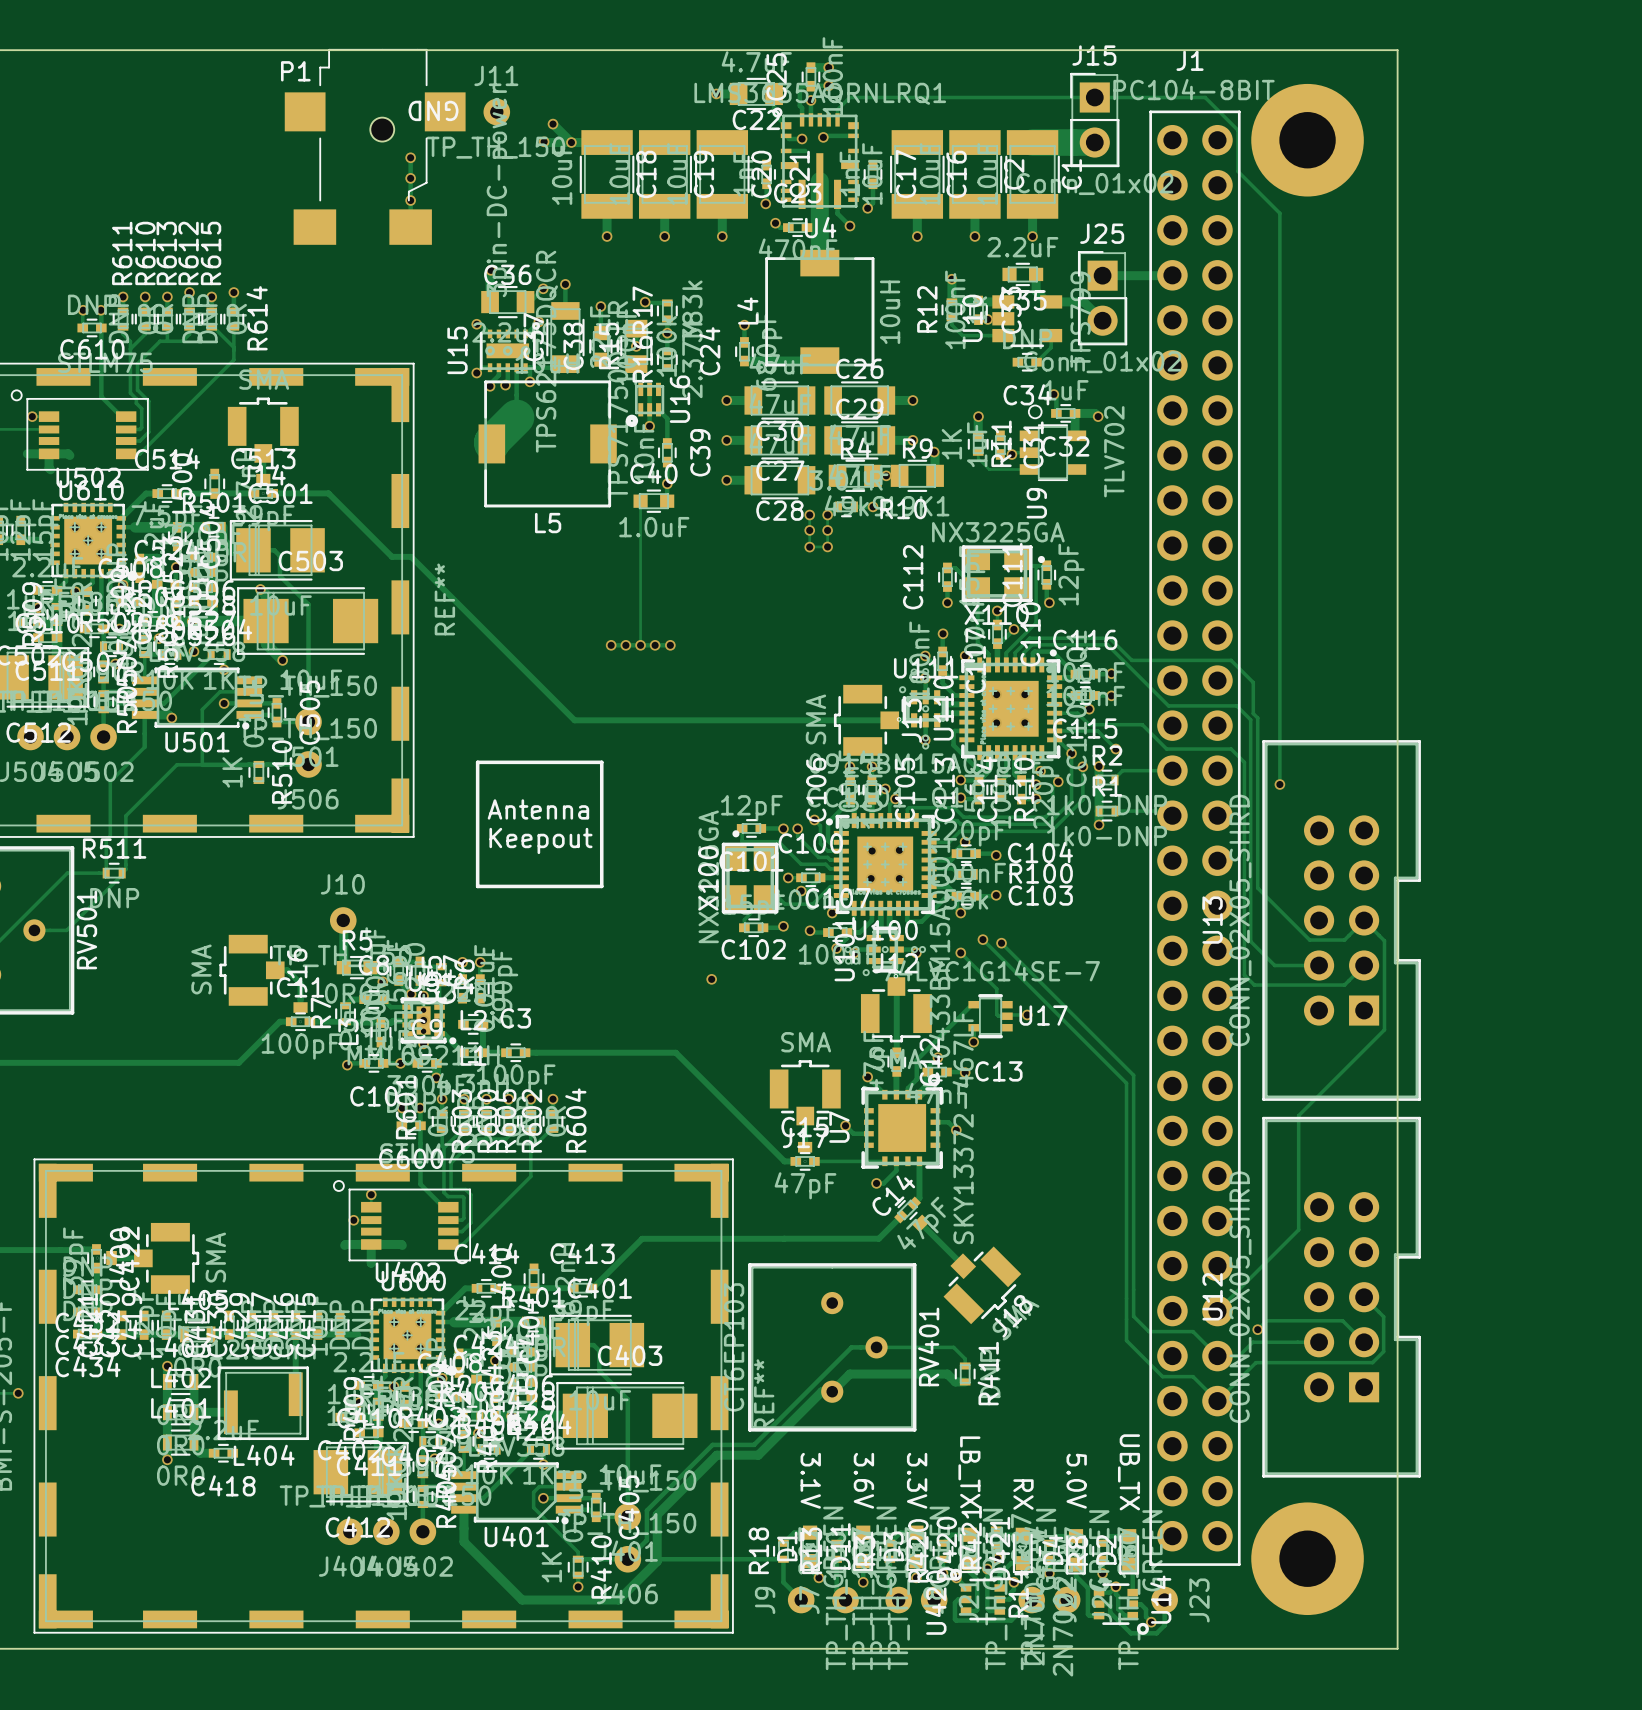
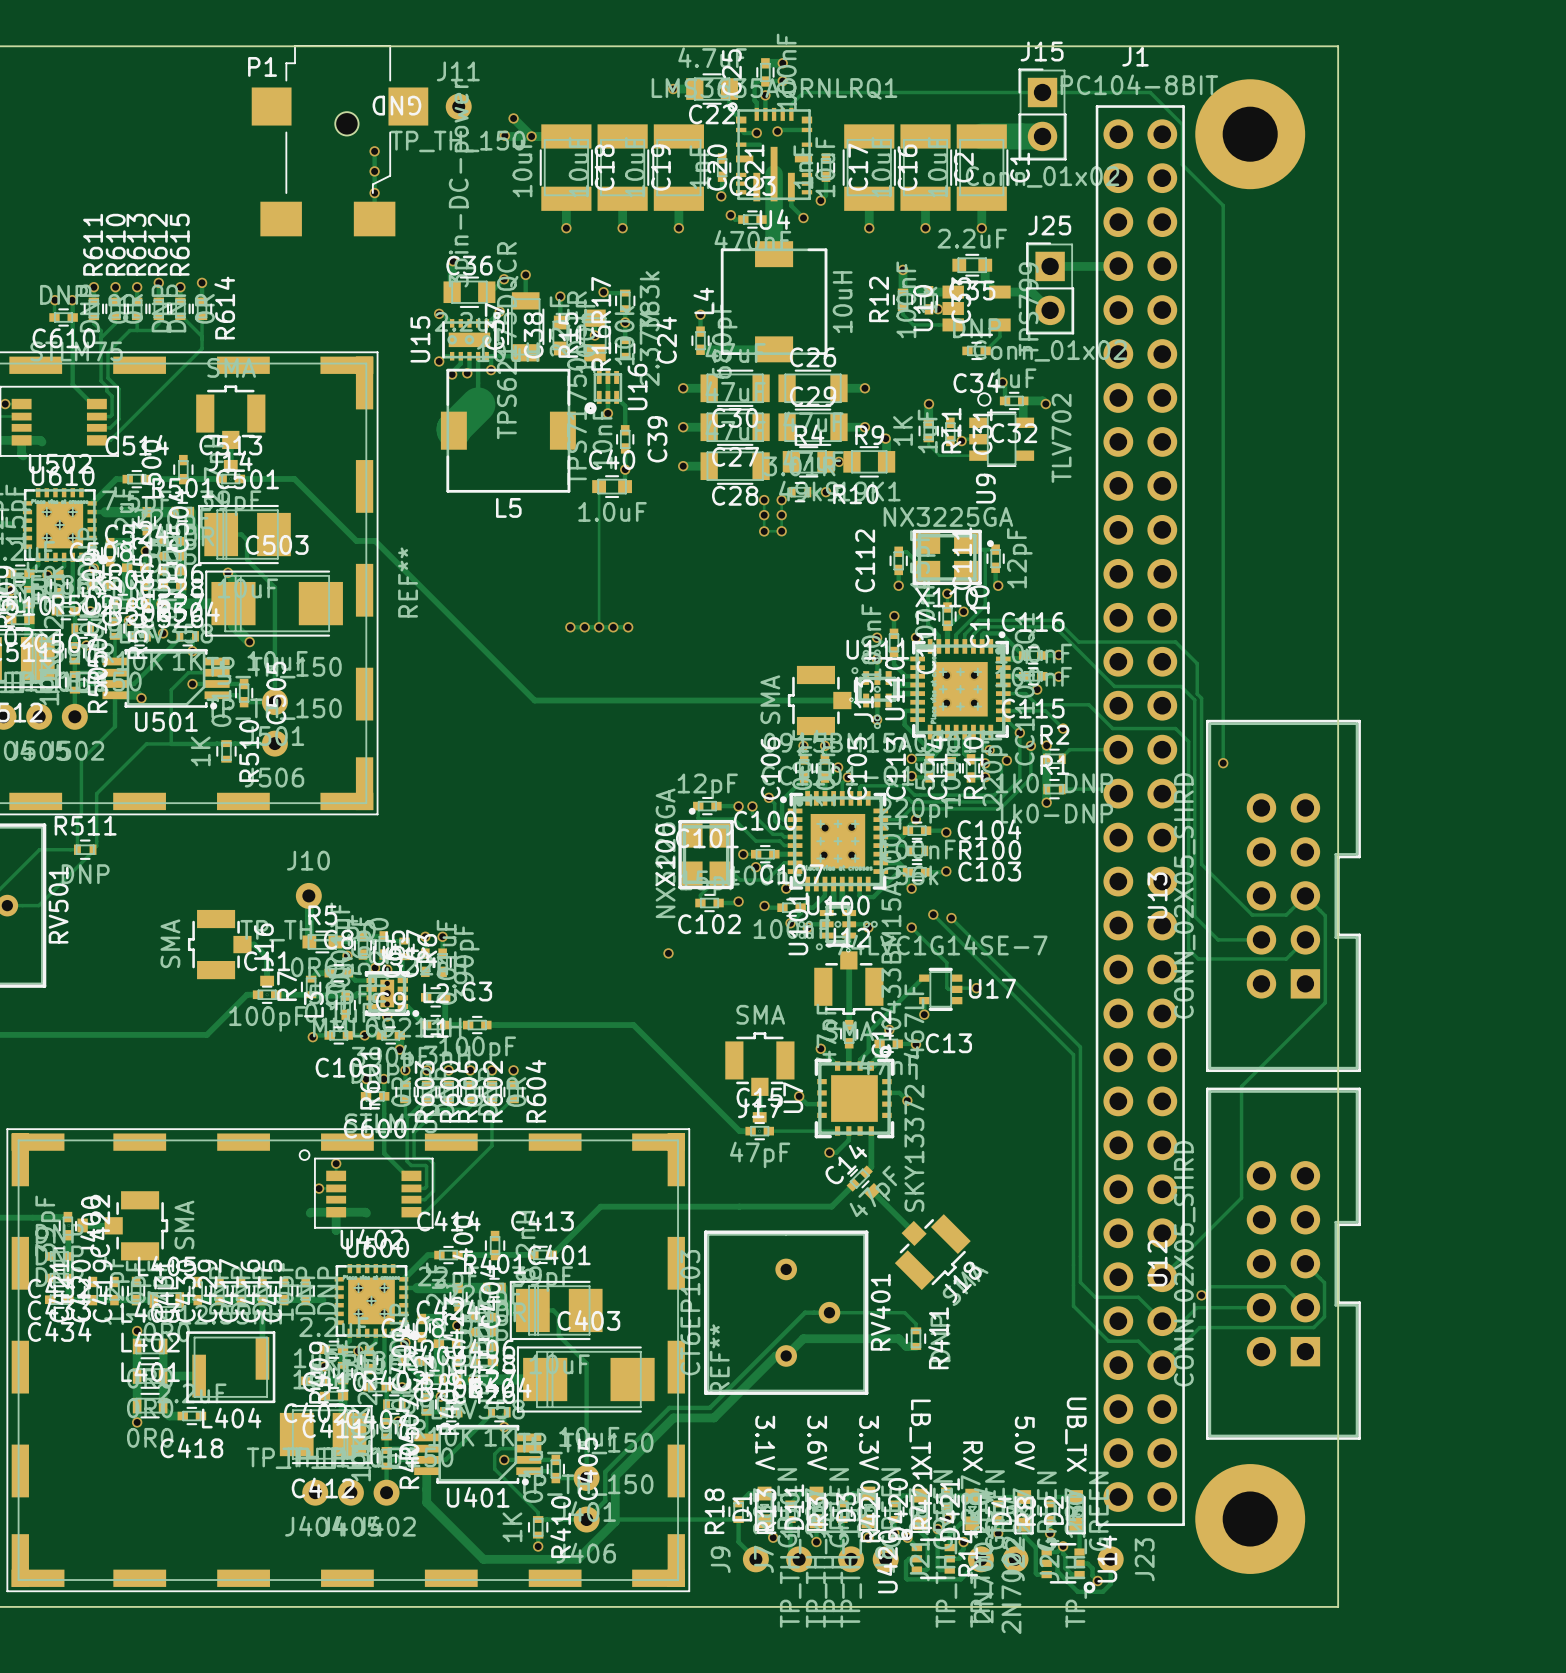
line: (477, 762) (477, 886) (601, 886) (601, 762) (477, 762) -> none
text: Antenna (538, 809) -> none
text: Keepout (540, 840) -> none

